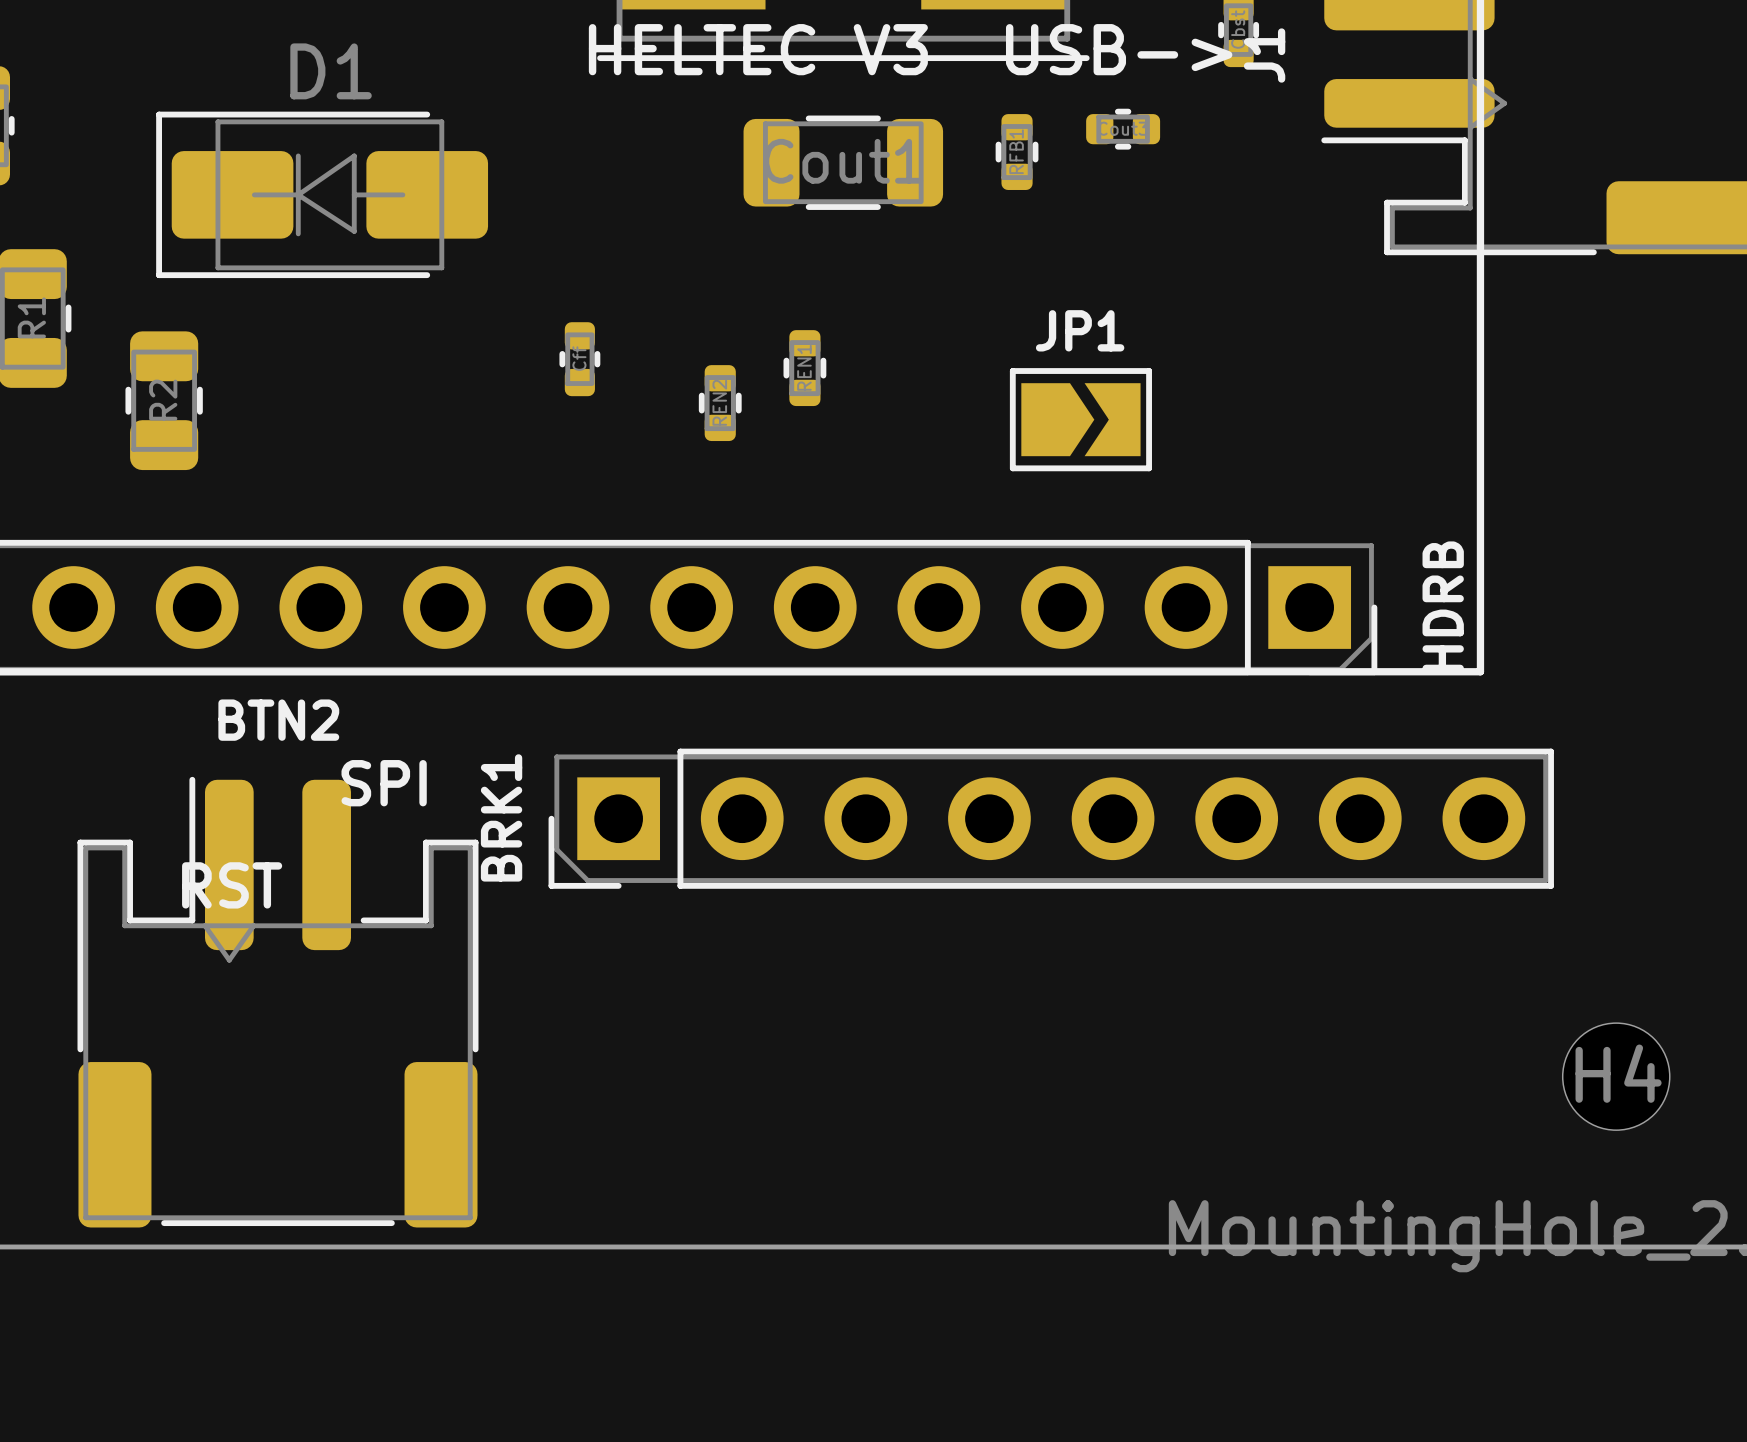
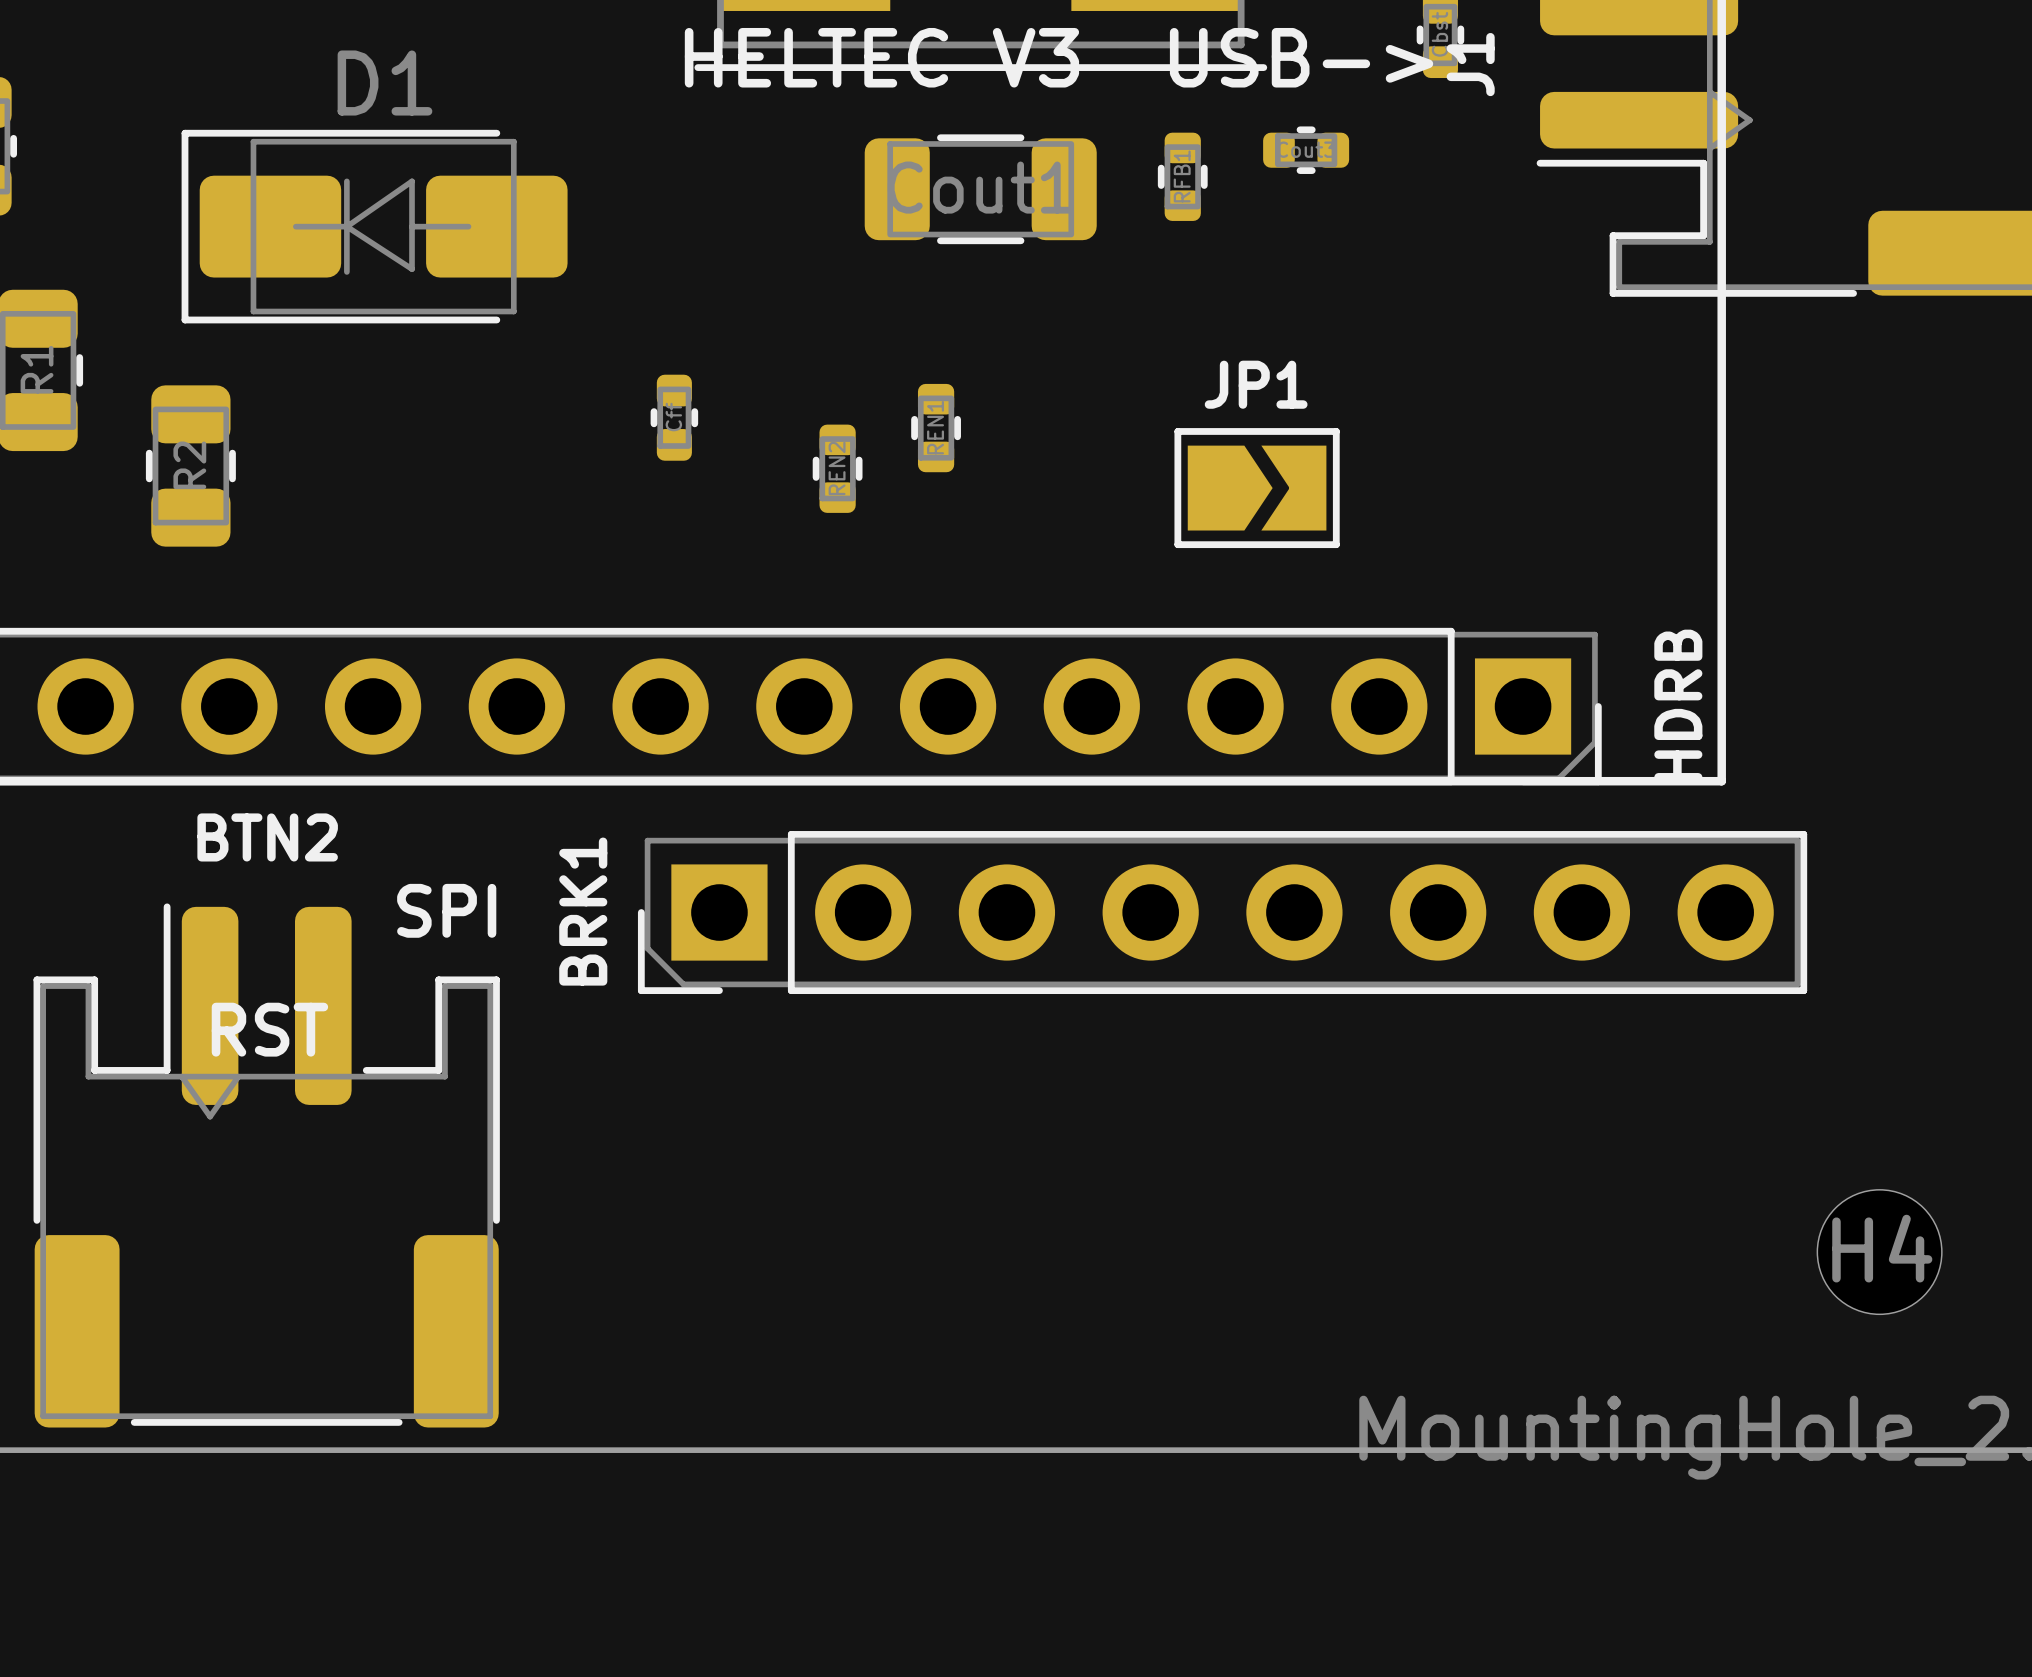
BRK1 position: (1051, 818) -> (1222, 912)
BTN2 position: (277, 1002) -> (266, 1165)

